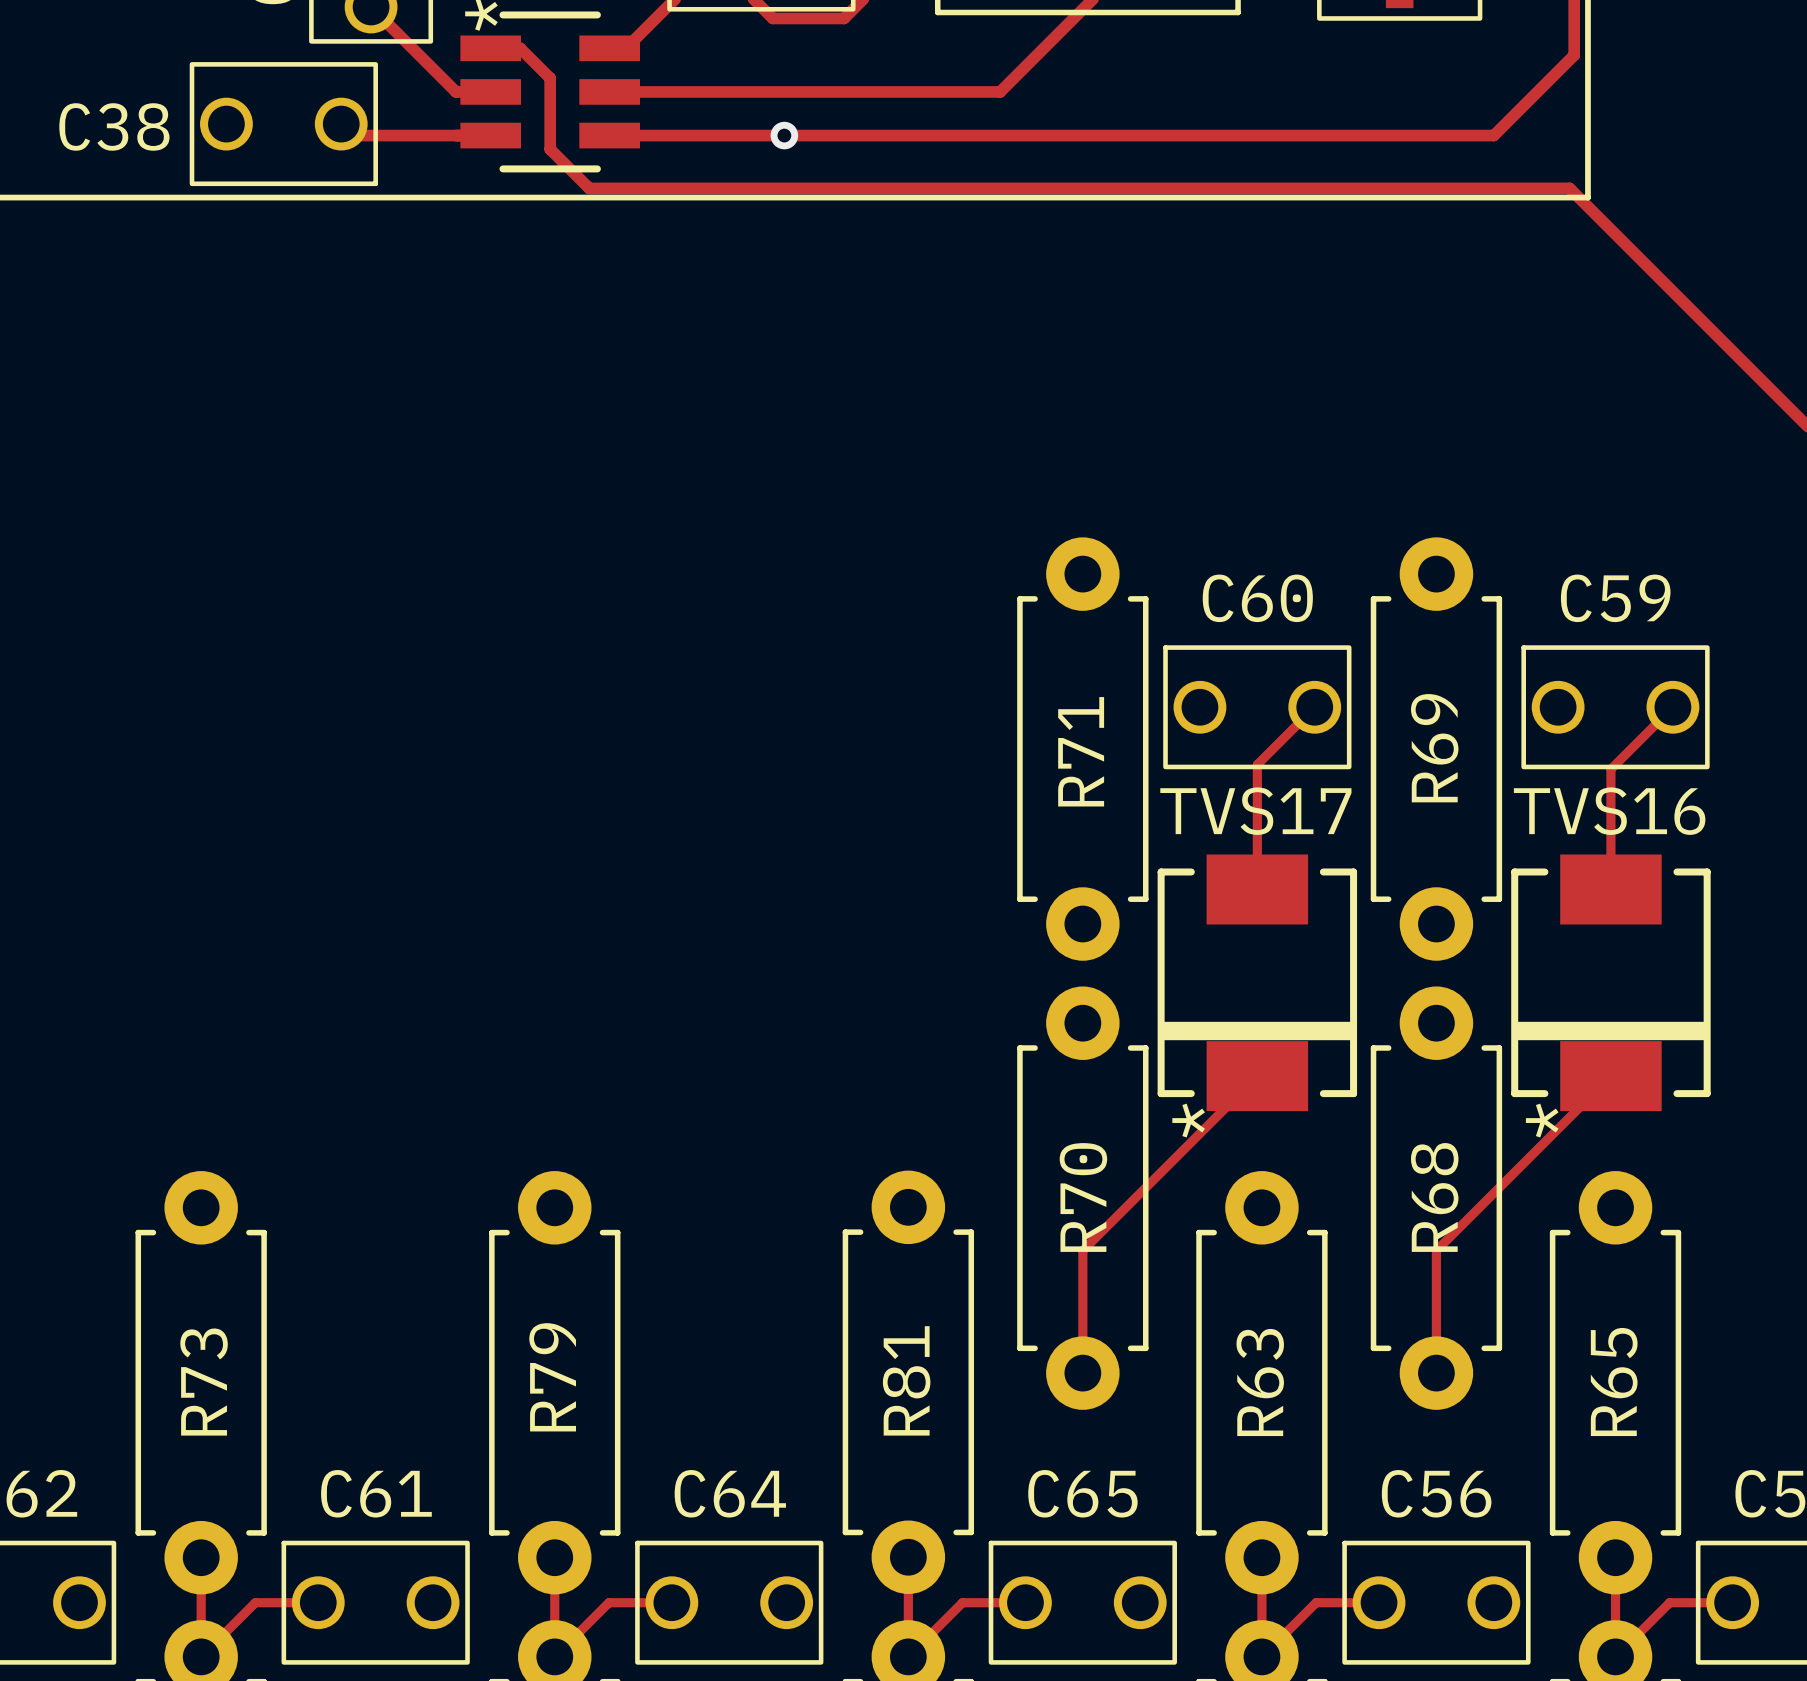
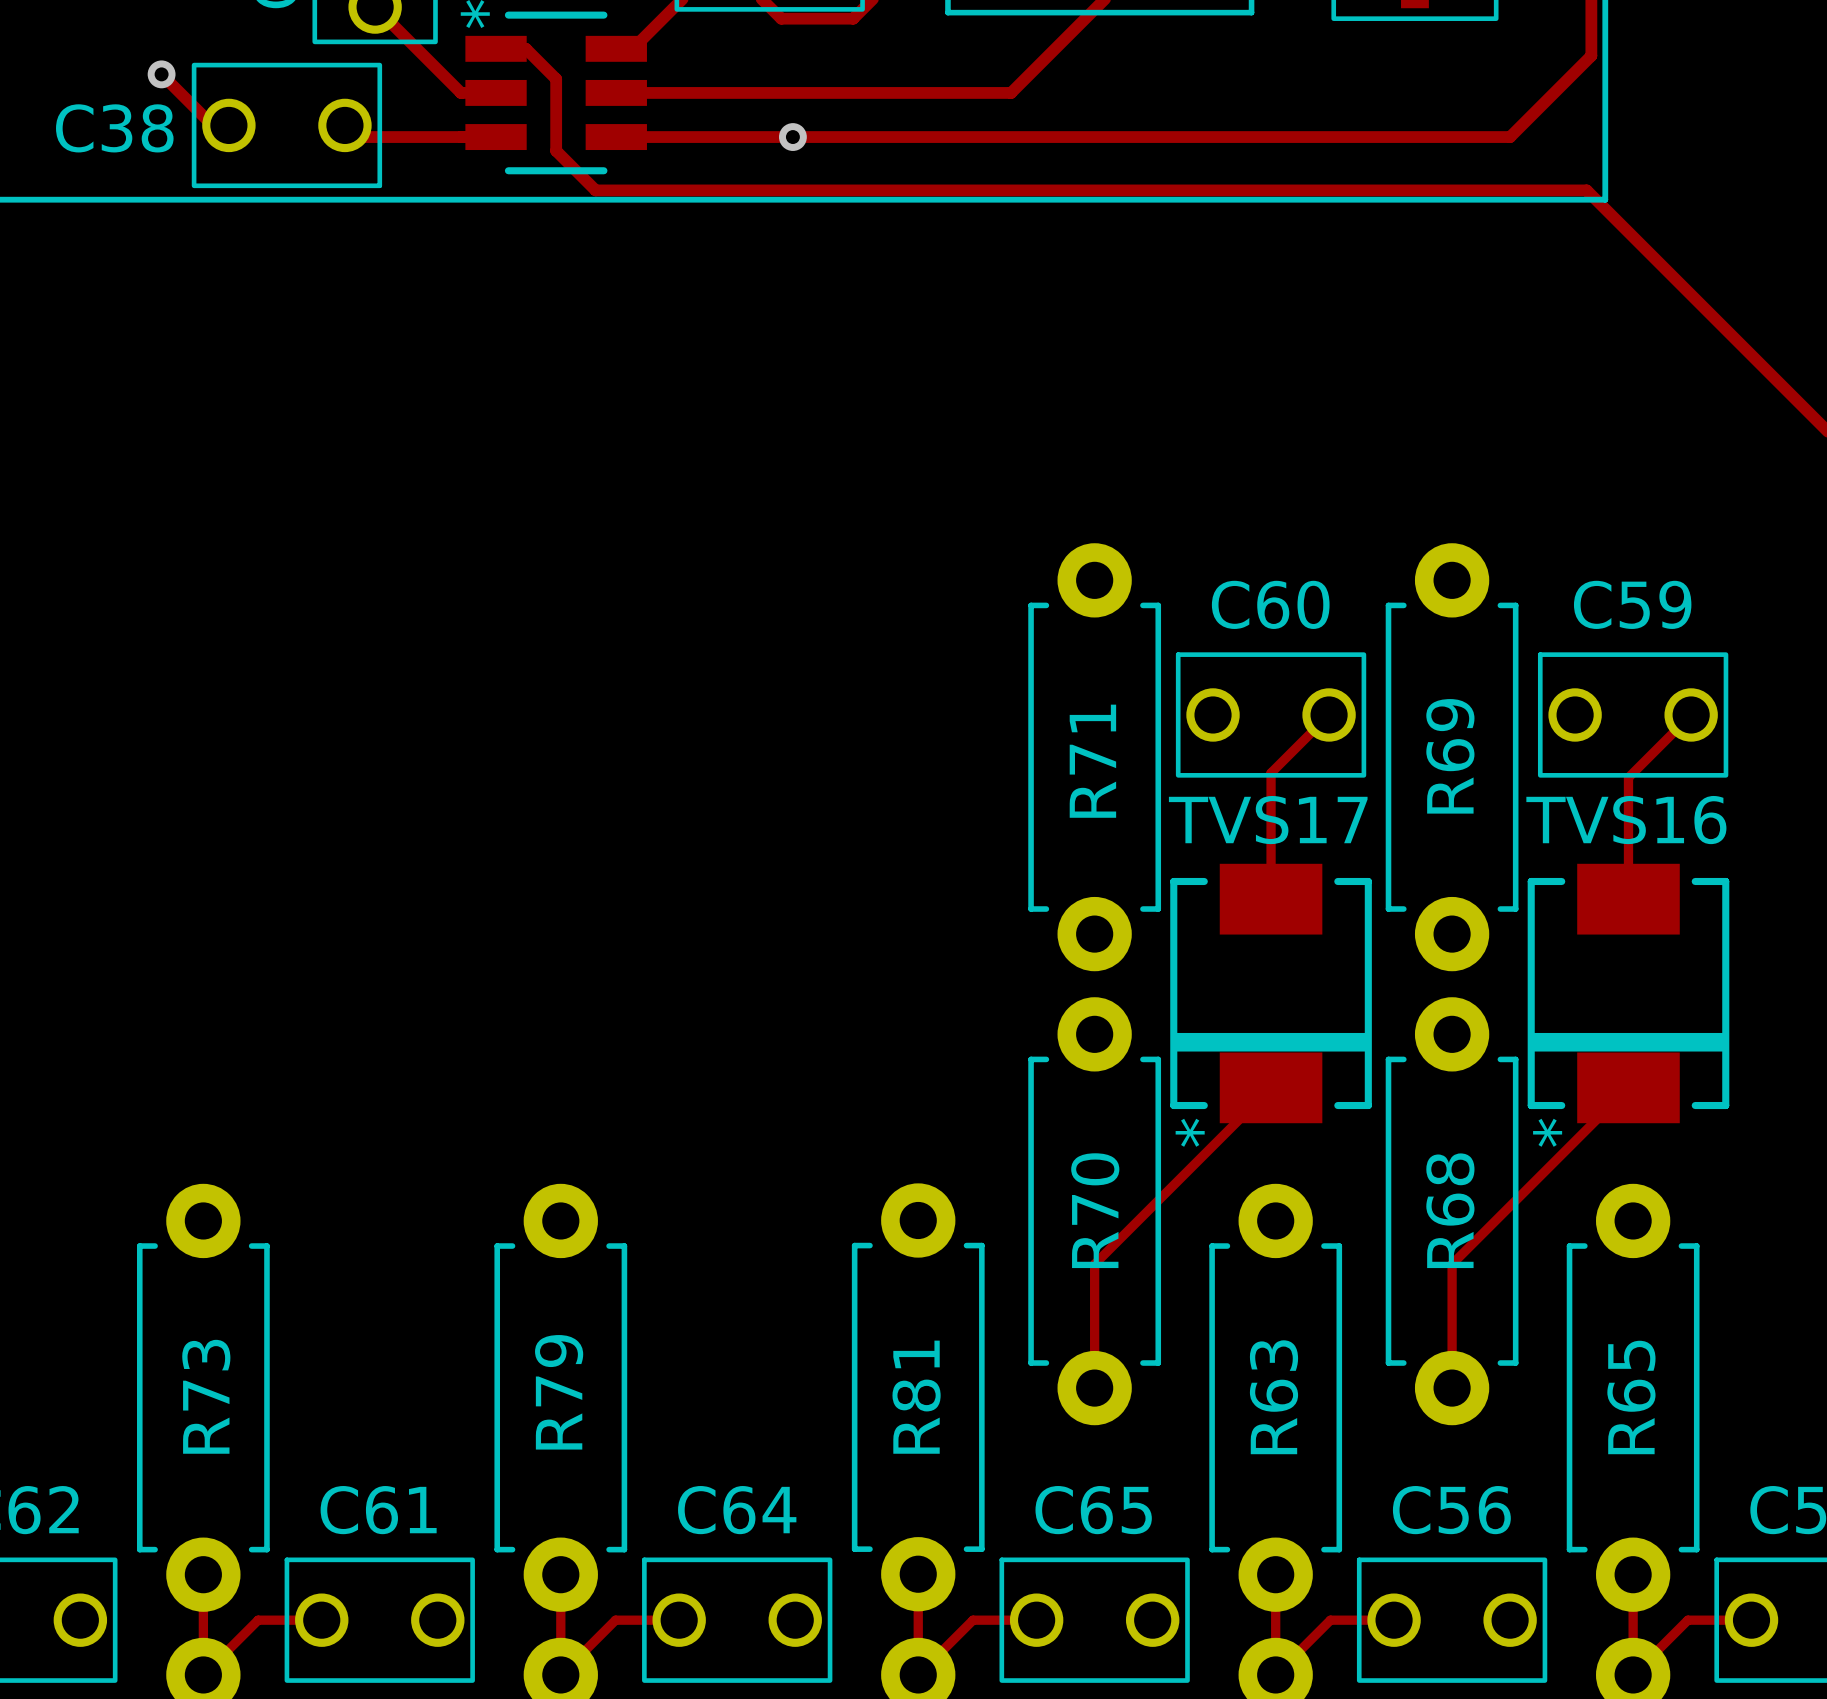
track: none -> (161, 74) (212, 125)
via: none -> (161, 74)

